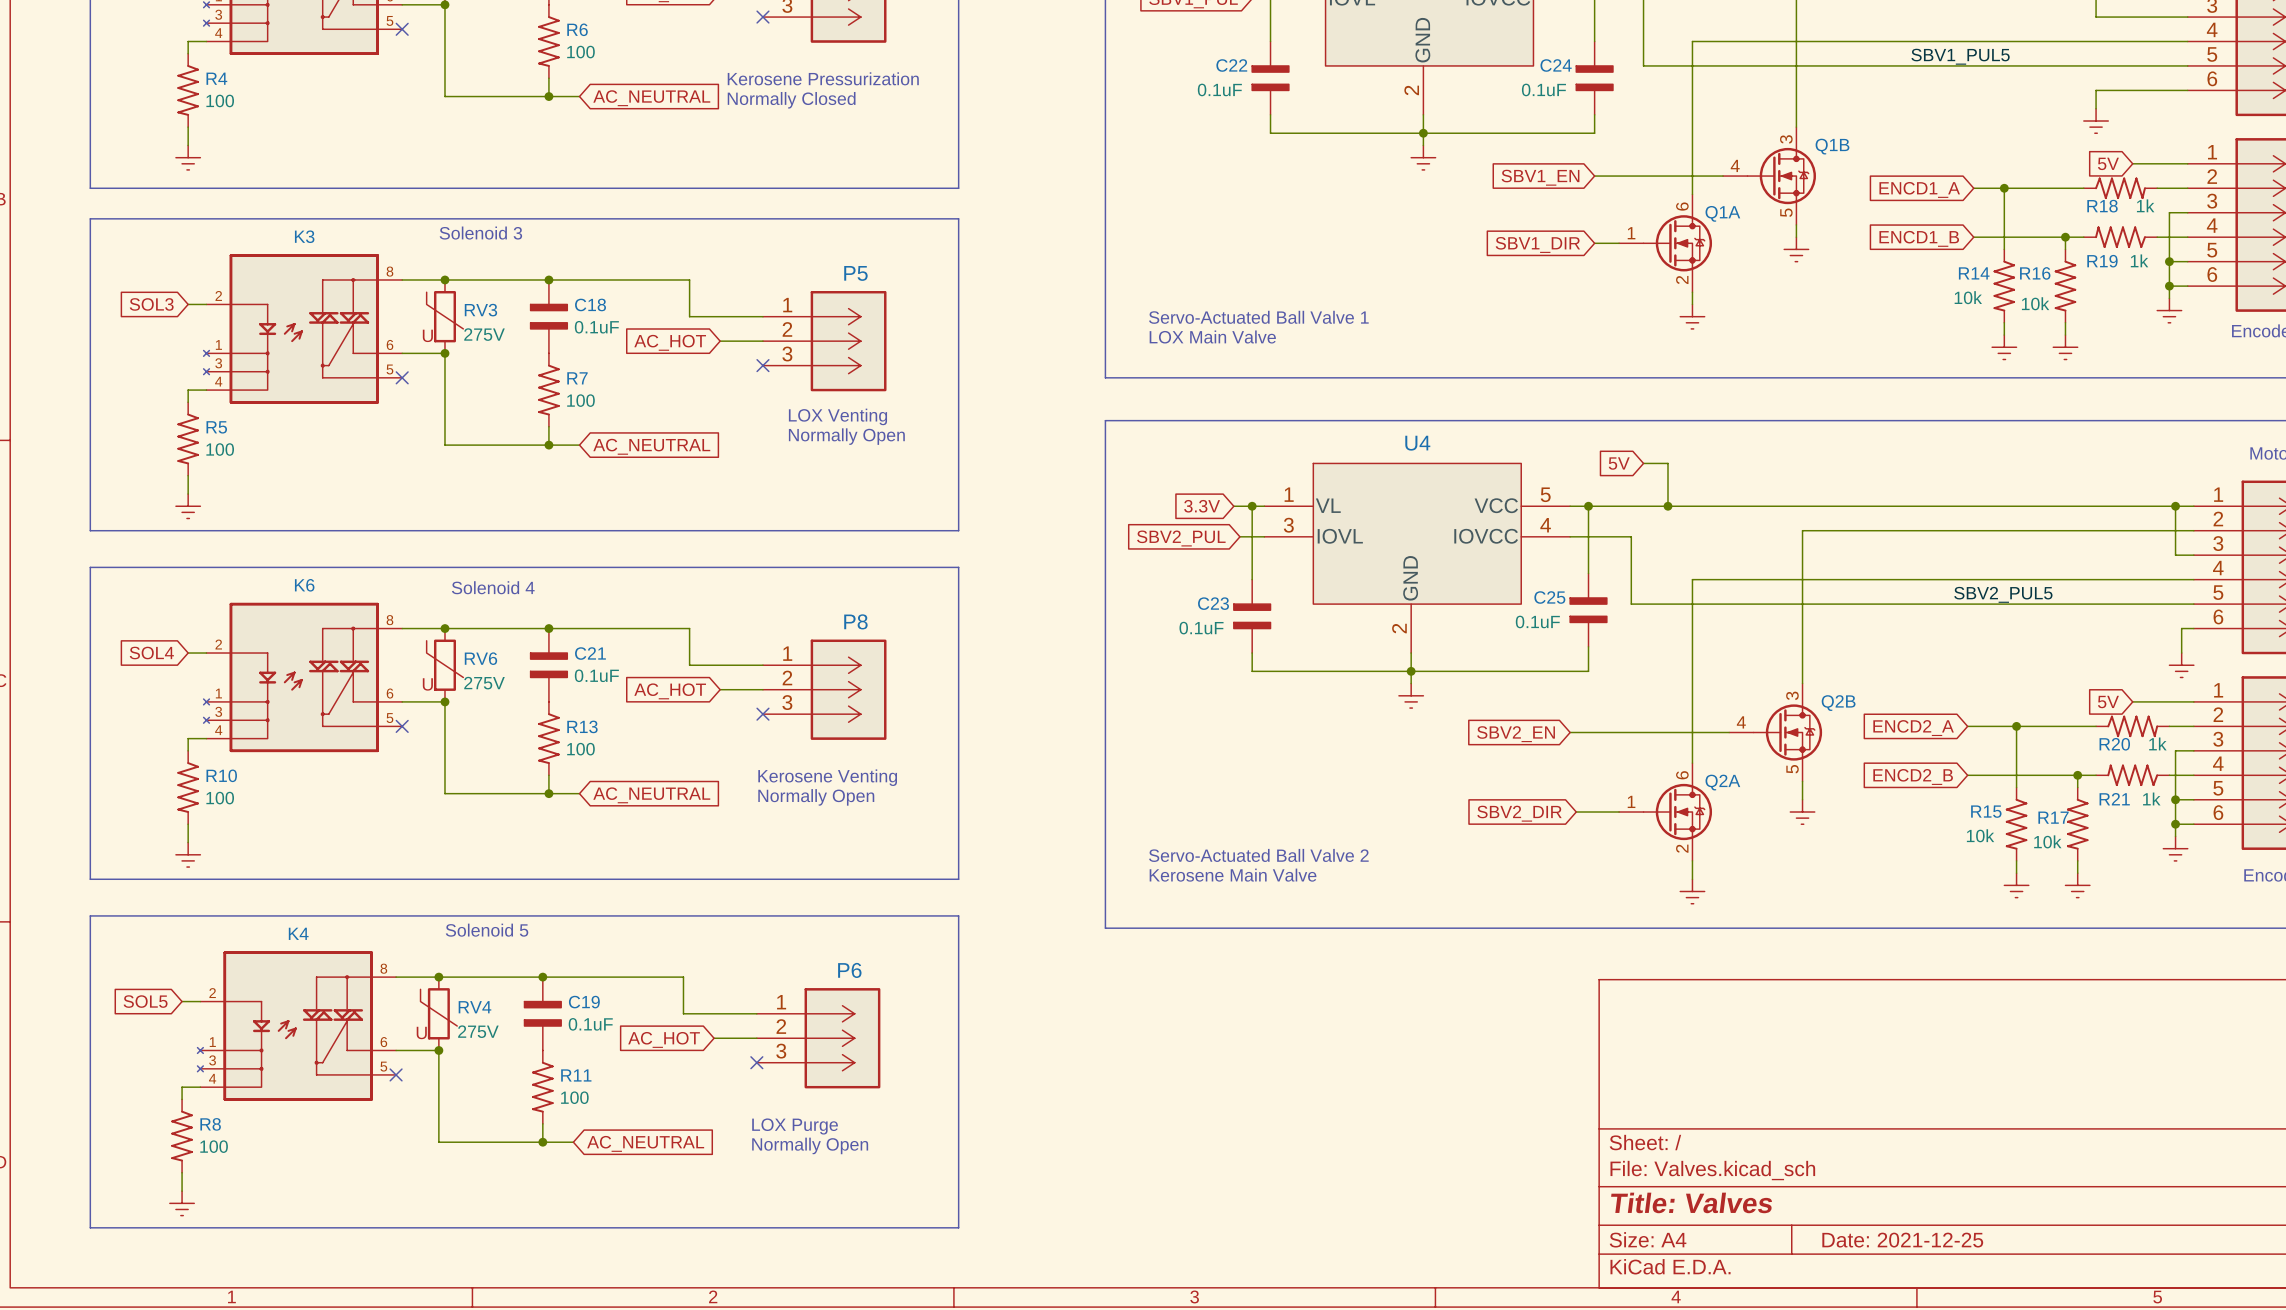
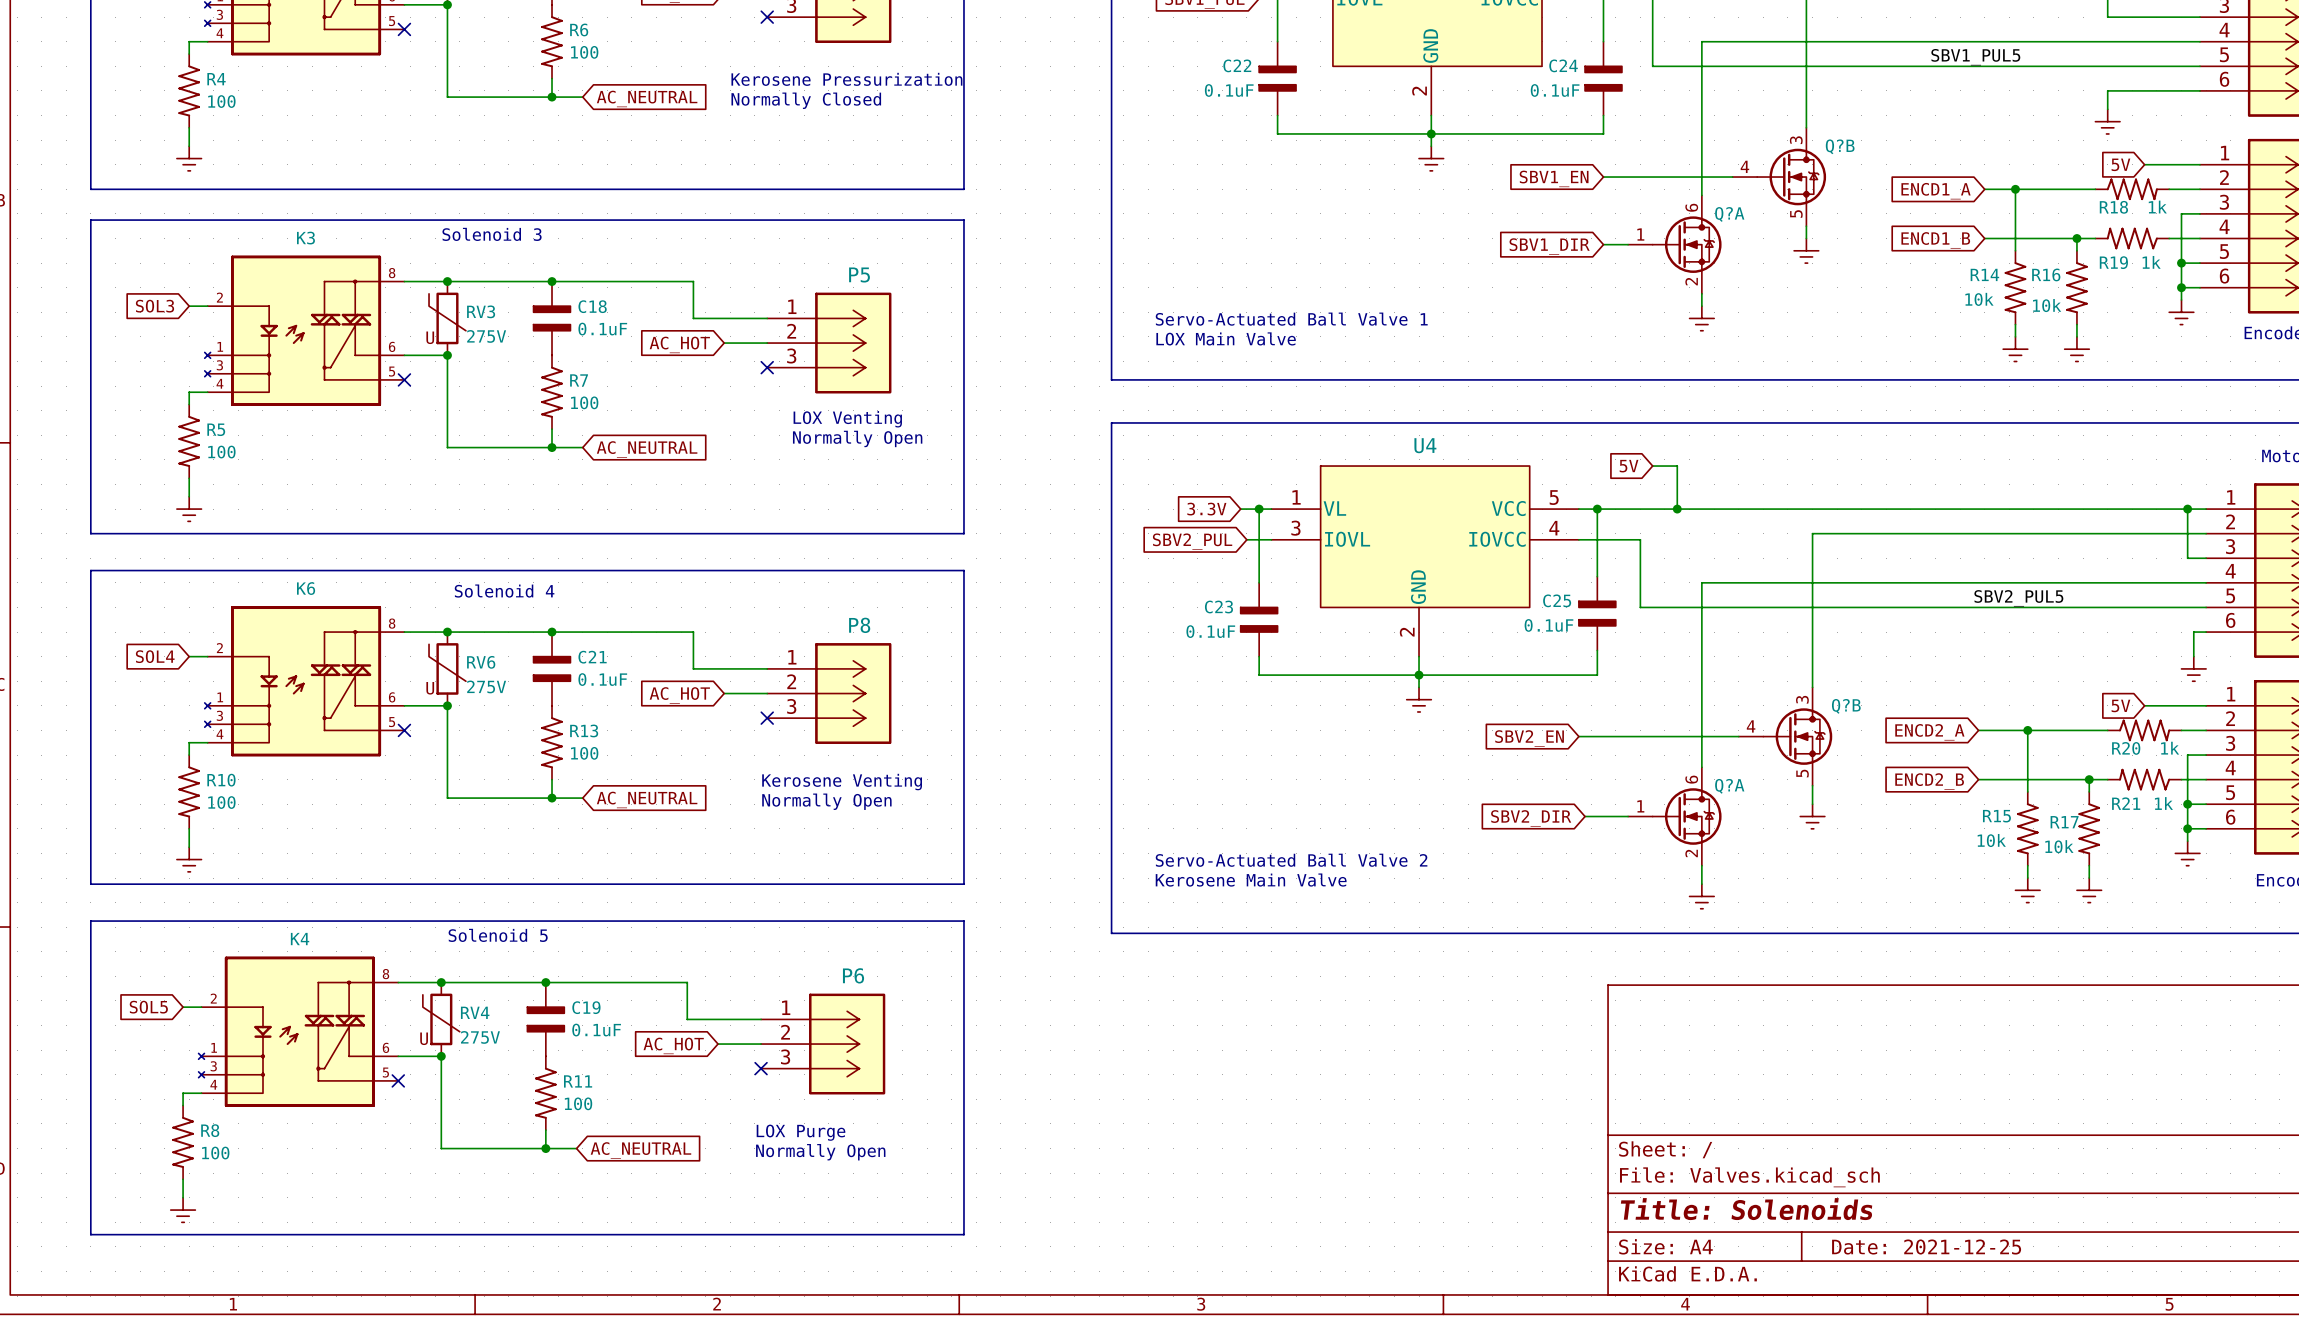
Q1B name: Q1B (1832, 146) -> Q?B (1840, 146)
Q1A name: Q1A (1722, 213) -> Q?A (1729, 214)
Q2B name: Q2B (1838, 703) -> Q?B (1846, 706)
Q2A name: Q2A (1722, 782) -> Q?A (1729, 786)
title block: Title: Valves (1691, 1202) -> Title: Solenoids (1746, 1209)

